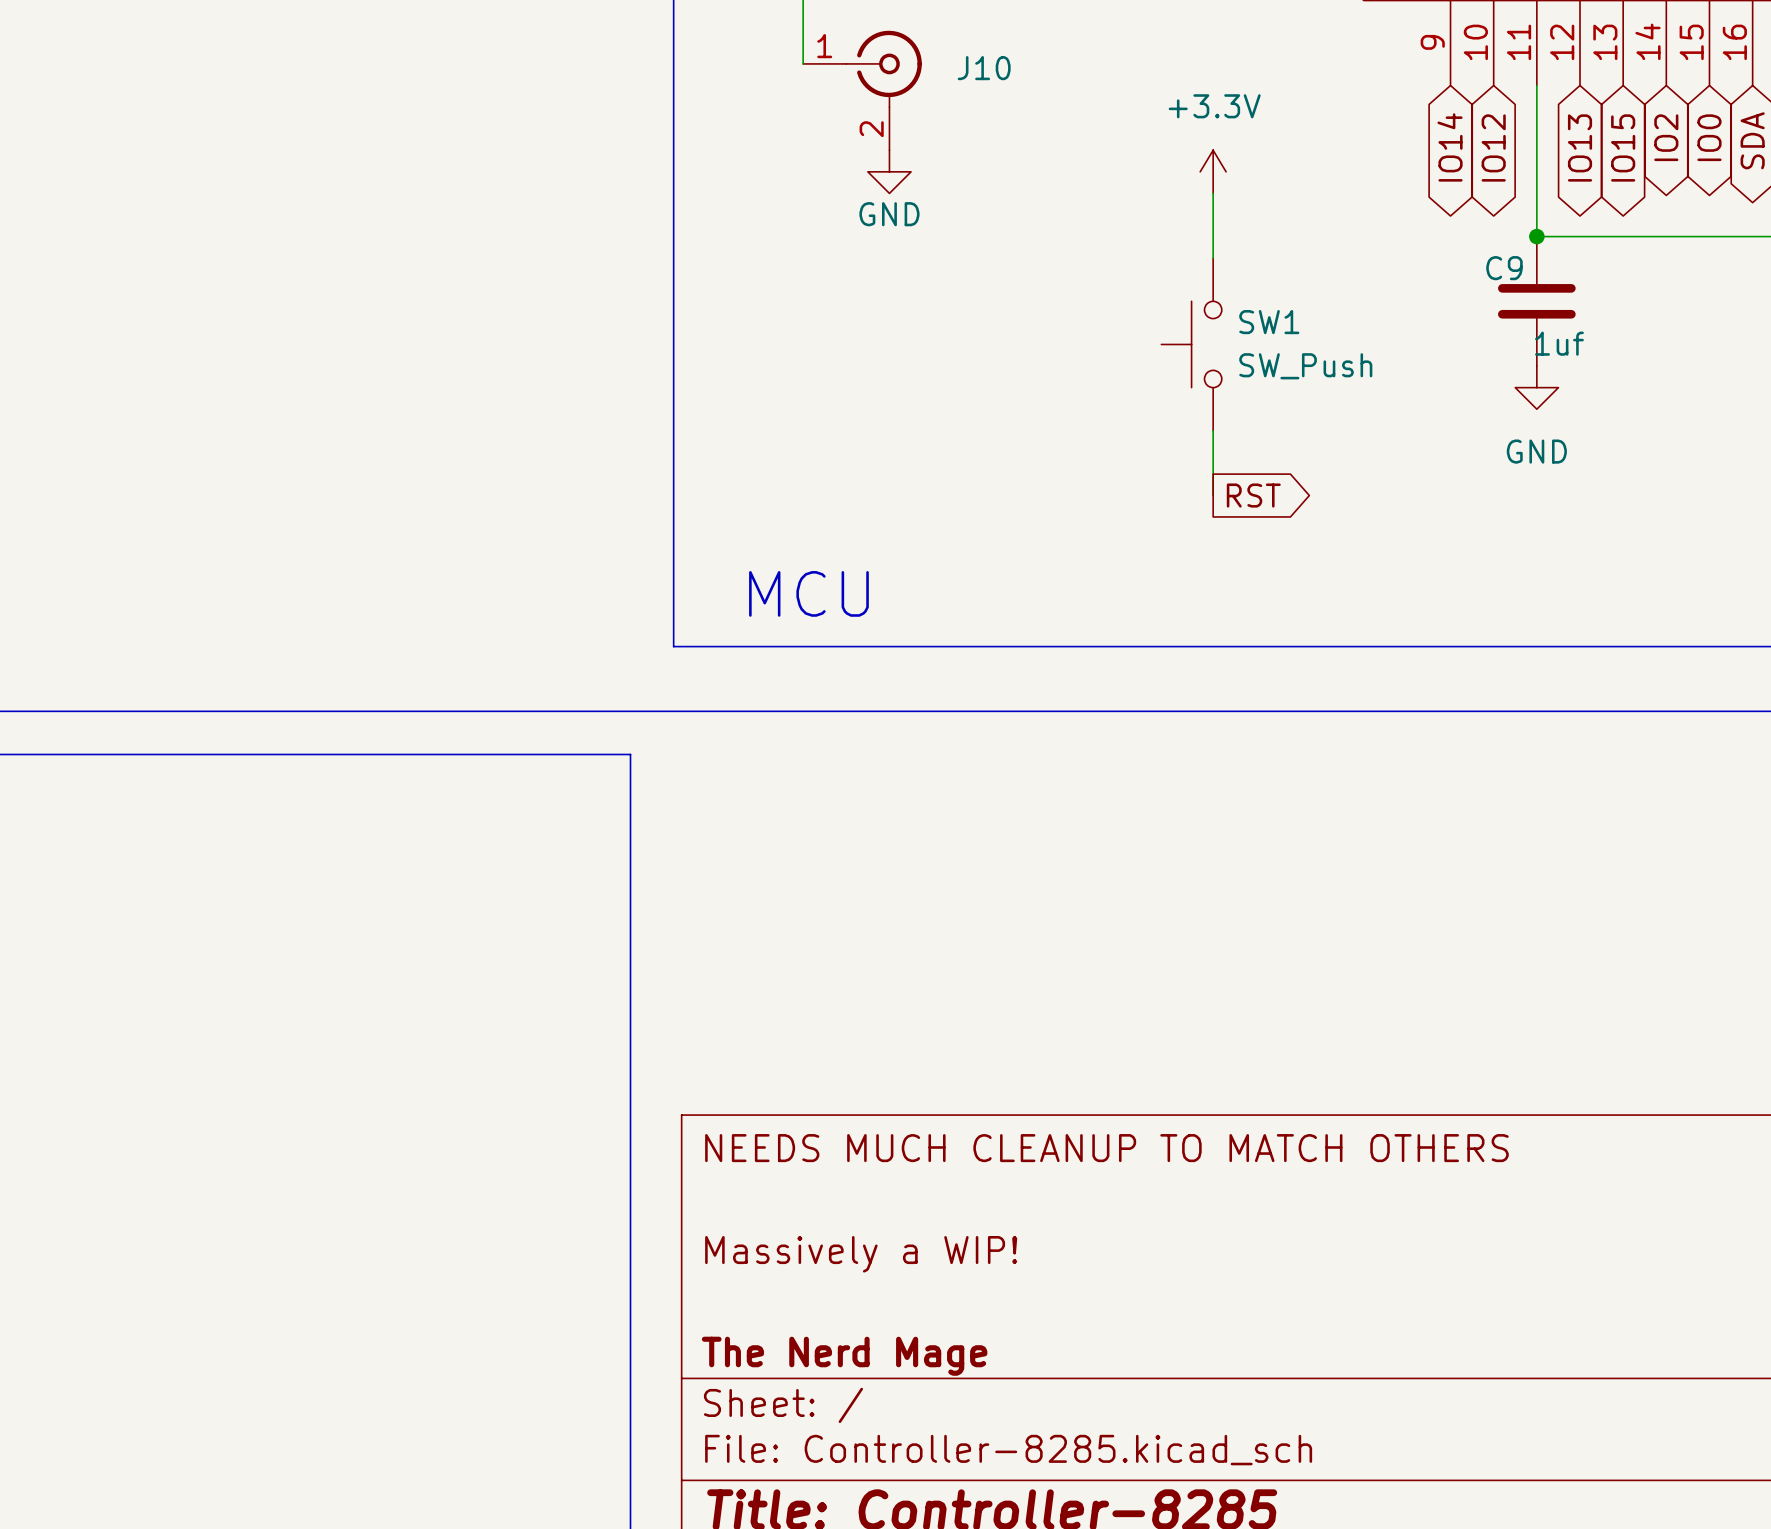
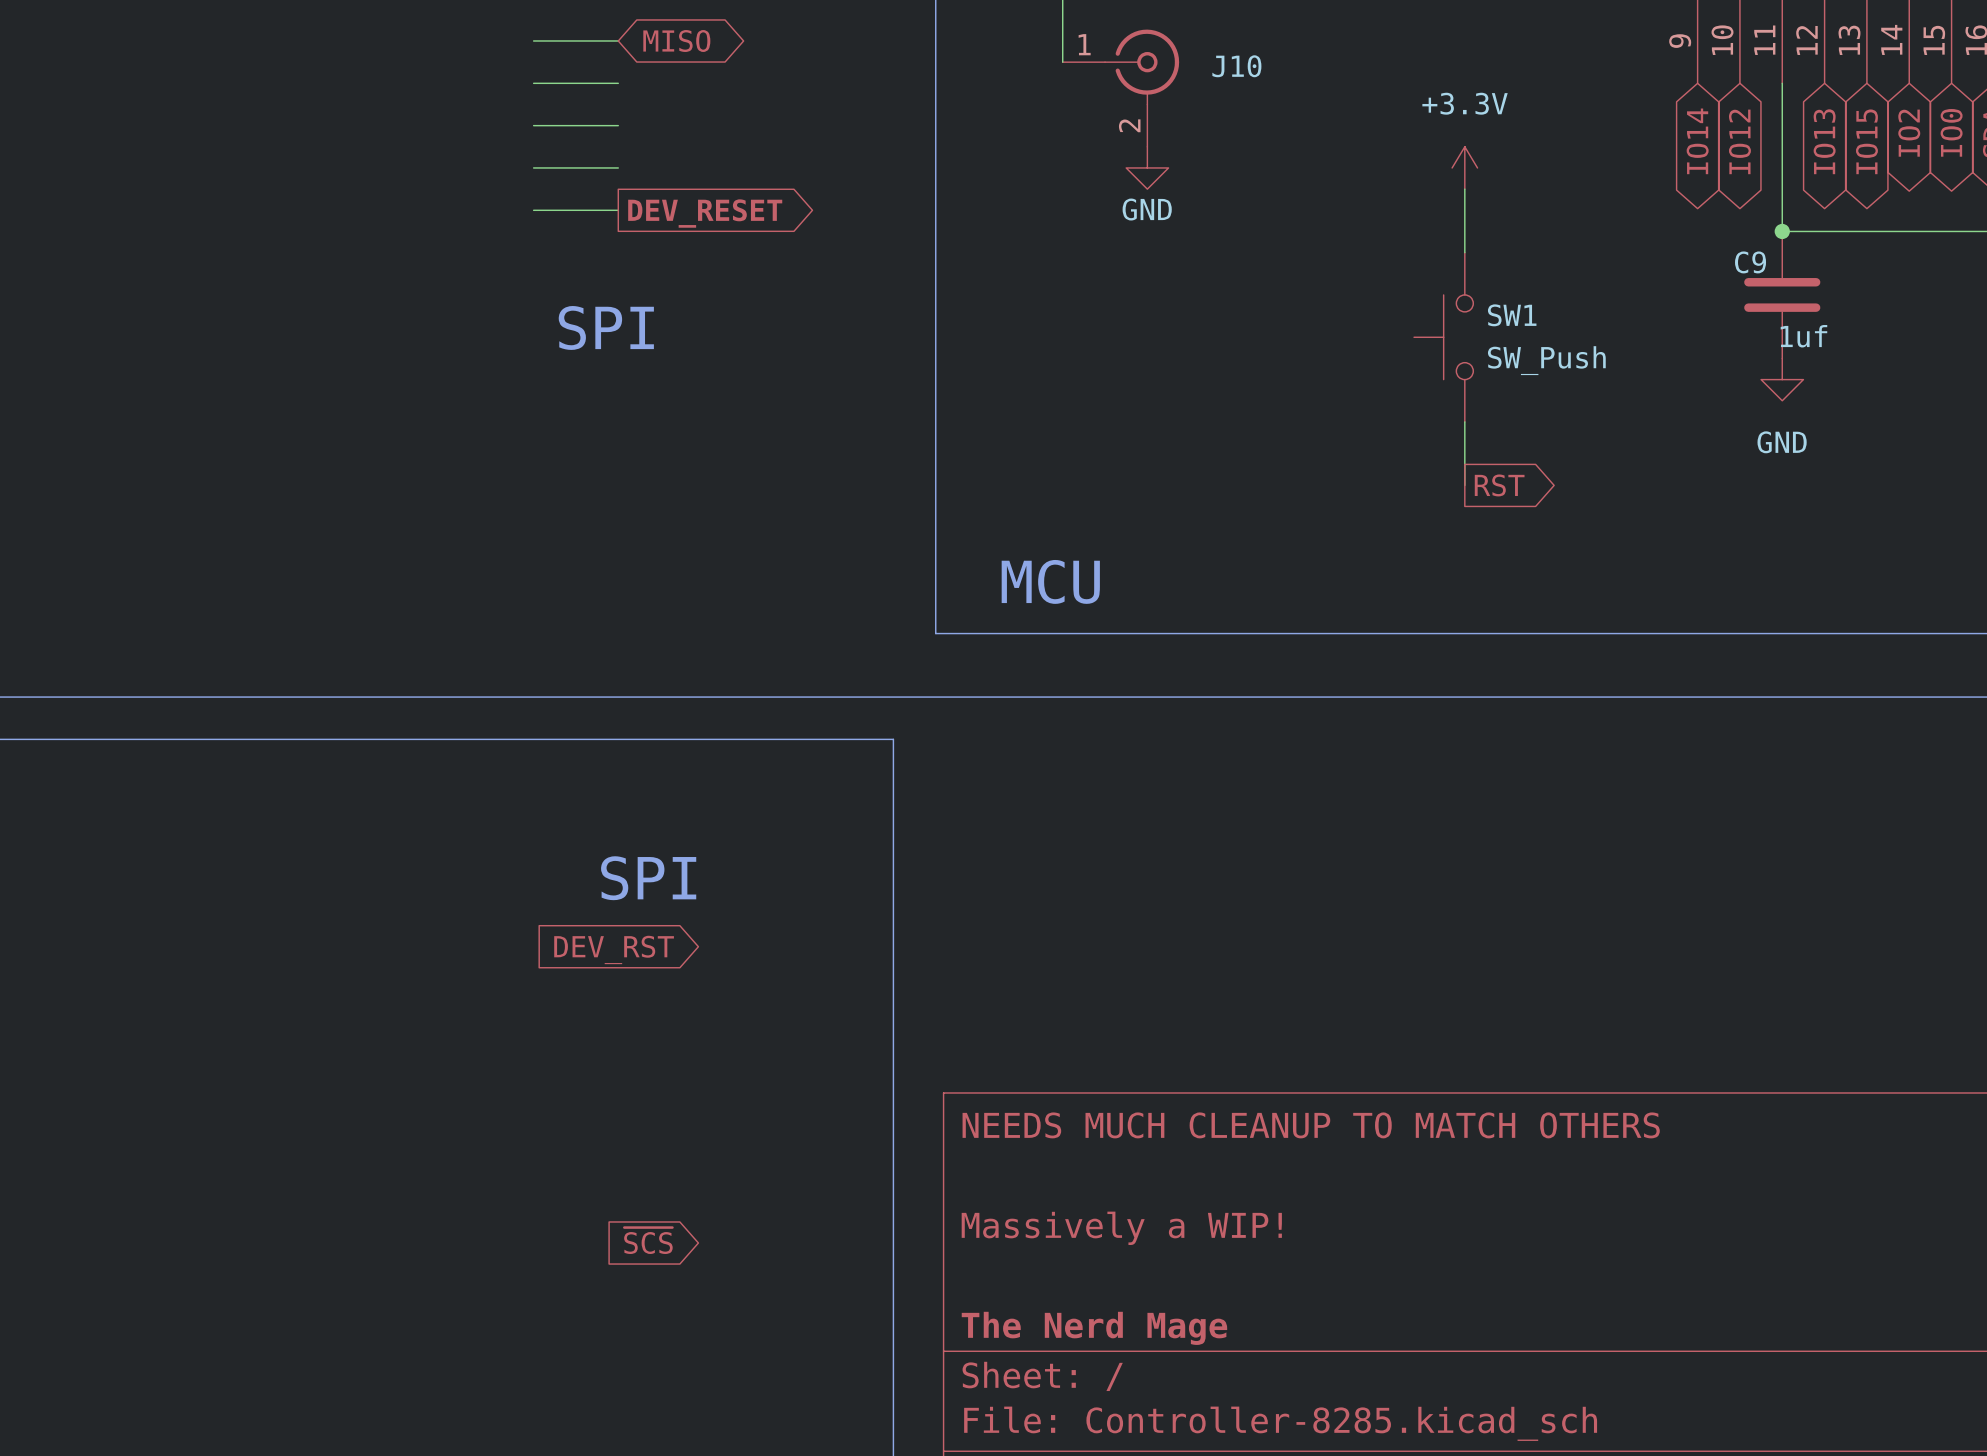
wire: none -> (533, 40) (618, 40)
global label: none -> MISO (676, 41)
wire: none -> (533, 83) (618, 83)
wire: none -> (533, 125) (618, 125)
wire: none -> (533, 167) (618, 167)
wire: none -> (533, 210) (618, 210)
global label: none -> DEV_RESET (705, 213)
text: none -> SPI (606, 327)
text: none -> SPI (648, 878)
global label: none -> DEV_RST (614, 949)
global label: none -> ~{SCS} (648, 1240)

